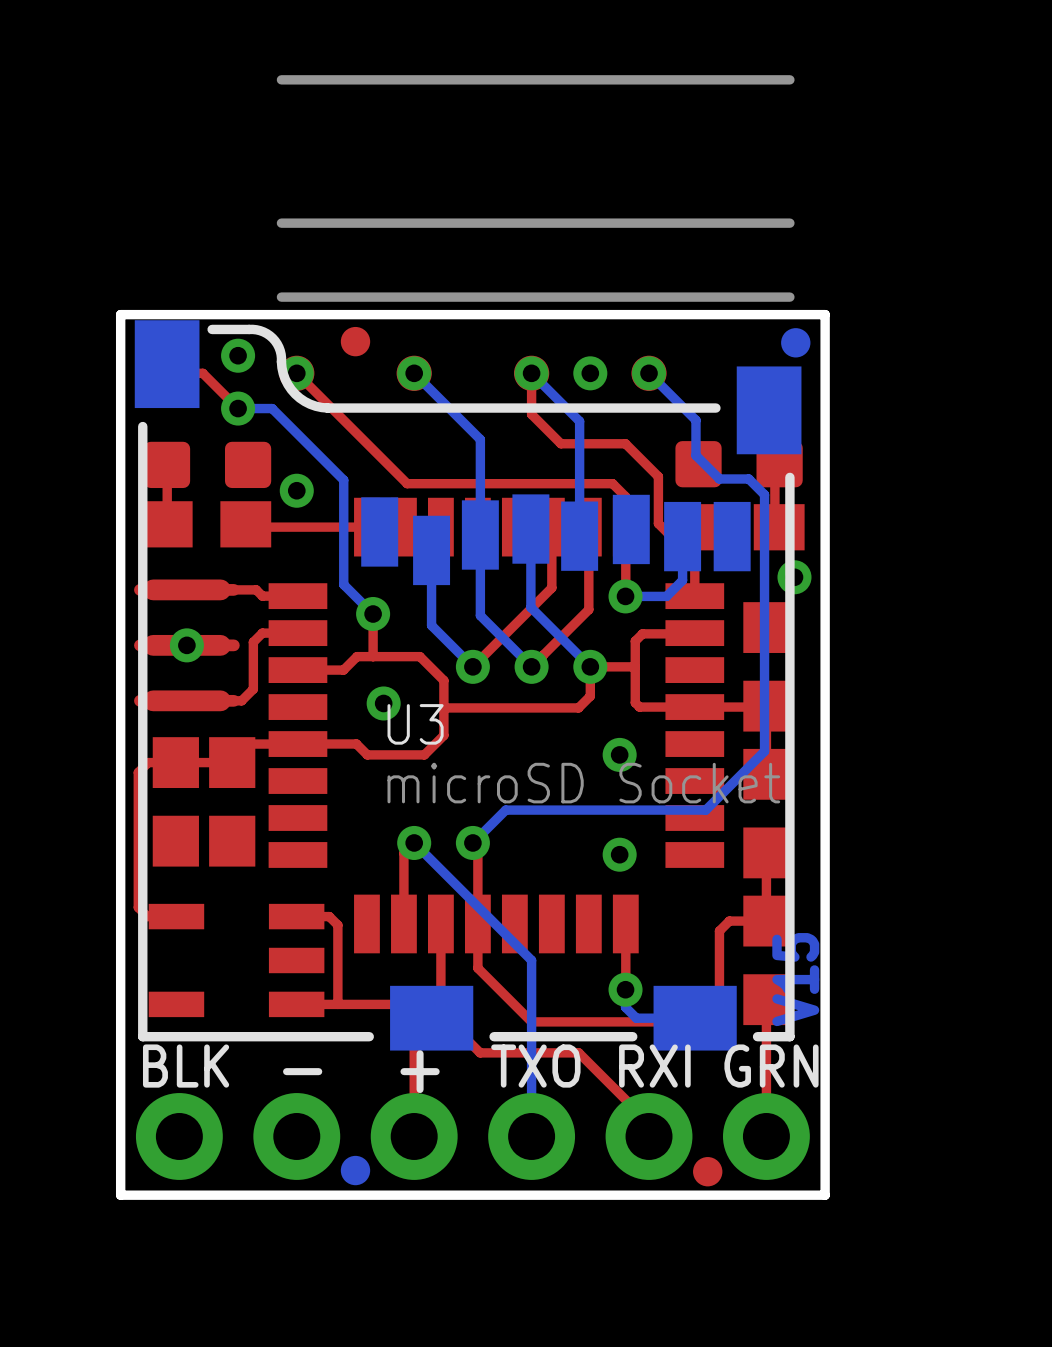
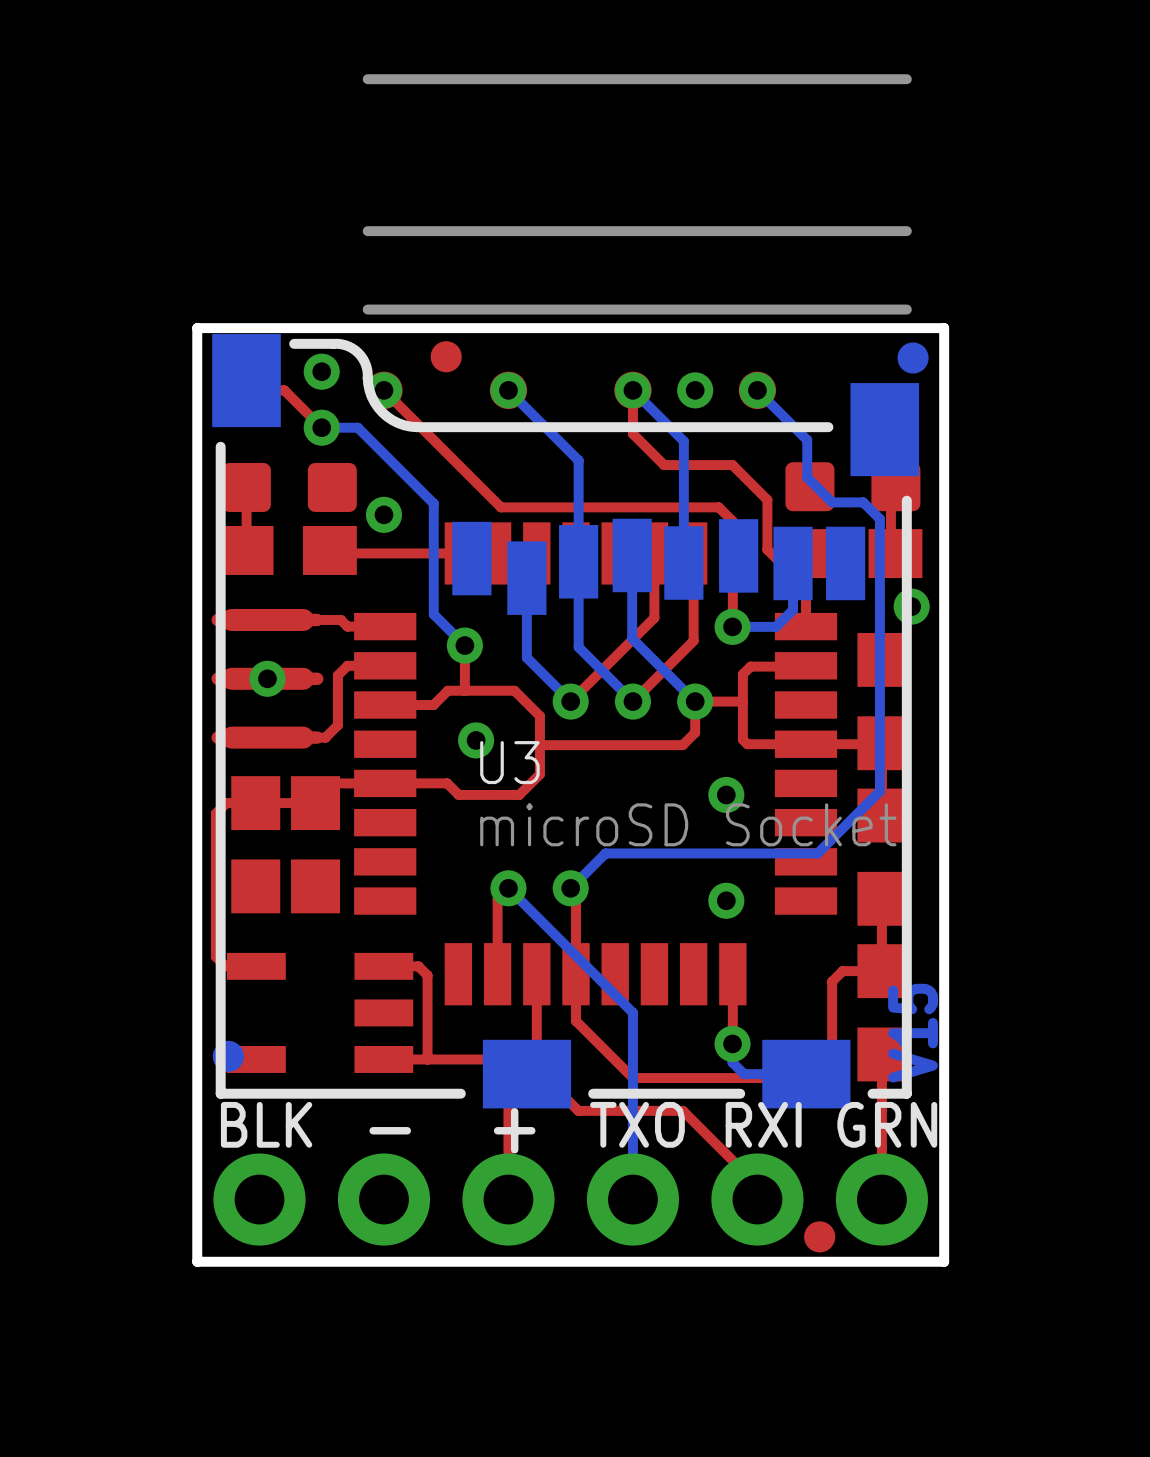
part position: (355, 1170) -> (228, 1056)

